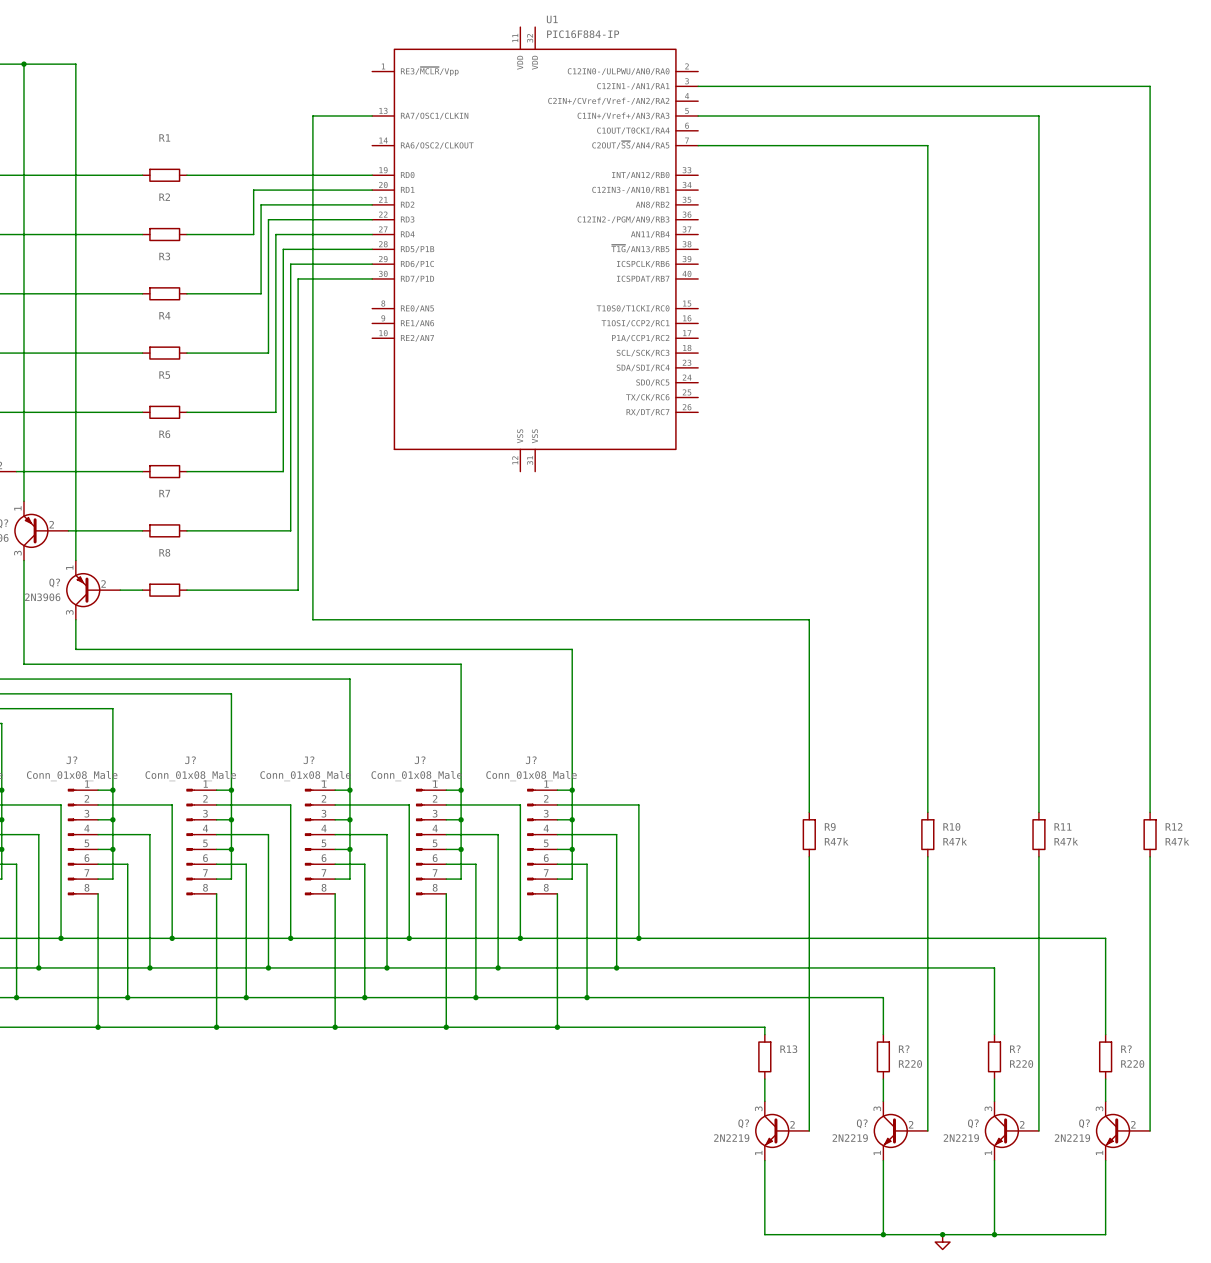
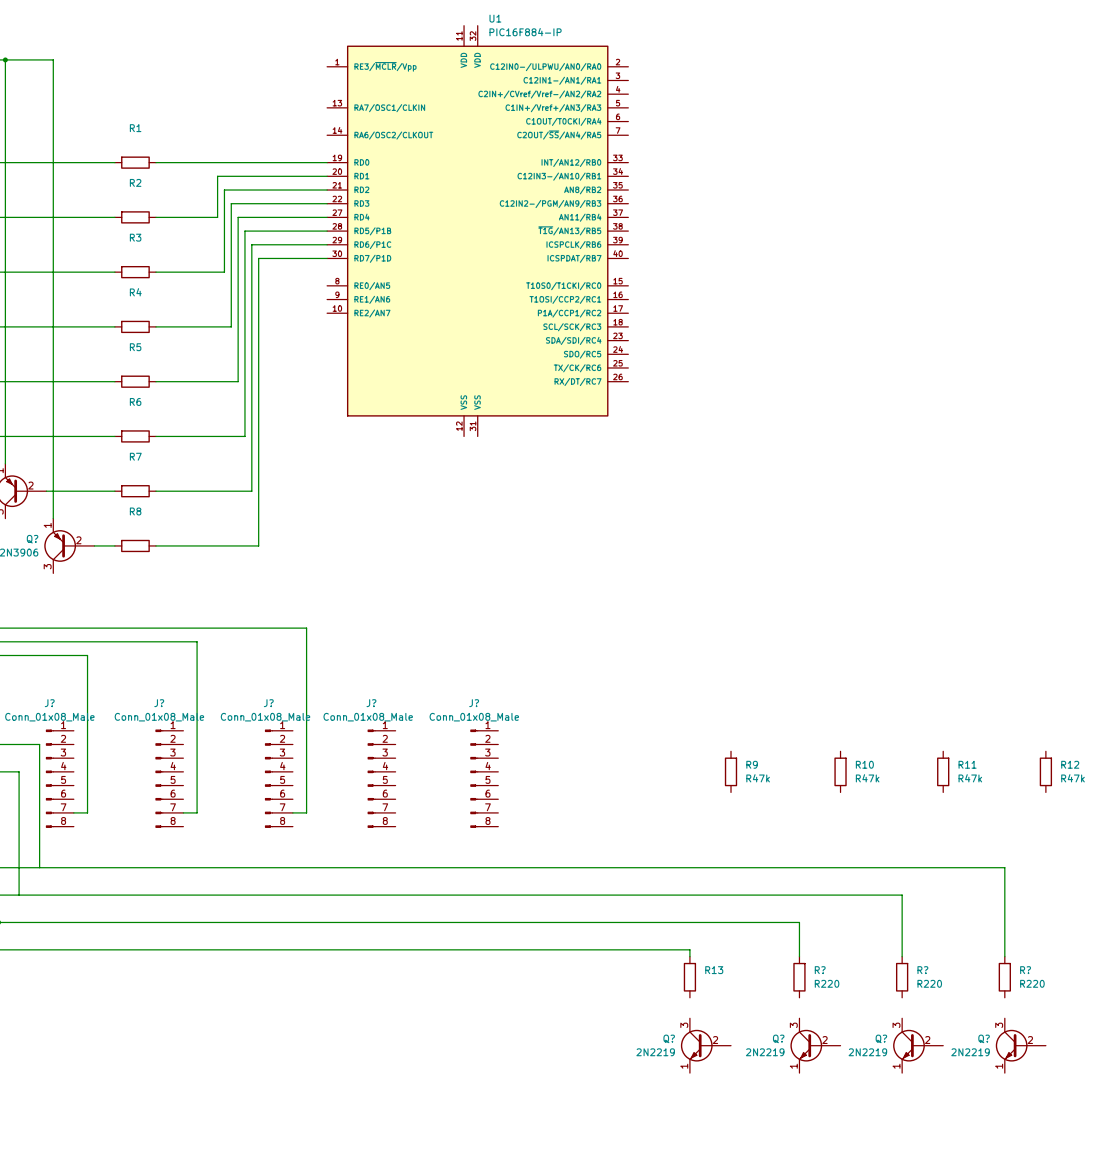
wire: (698, 86) (1150, 86) (1150, 812) -> none
wire: (372, 116) (312, 116) (312, 619) (809, 619) (809, 812) -> none
wire: (698, 116) (1038, 116) (1038, 812) -> none
wire: (698, 145) (927, 145) (927, 812) -> none
wire: (23, 560) (23, 664) (461, 664) (461, 879) (446, 879) -> none
wire: (75, 619) (75, 649) (572, 649) (572, 879) (557, 879) -> none
wire: (98, 790) (112, 790) -> none
junction: (112, 790) -> none
wire: (216, 790) (231, 790) -> none
junction: (231, 790) -> none
wire: (335, 790) (349, 790) -> none
junction: (349, 790) -> none
wire: (446, 790) (461, 790) -> none
junction: (461, 790) -> none
wire: (557, 790) (572, 790) -> none
junction: (572, 790) -> none
wire: (98, 804) (172, 804) (172, 938) -> none
wire: (216, 804) (290, 804) (290, 938) -> none
wire: (335, 804) (409, 804) (409, 938) -> none
wire: (446, 804) (520, 804) (520, 938) -> none
wire: (557, 804) (638, 804) (638, 938) -> none
wire: (98, 819) (112, 819) -> none
junction: (112, 819) -> none
wire: (216, 819) (231, 819) -> none
junction: (231, 819) -> none
wire: (335, 819) (349, 819) -> none
junction: (349, 819) -> none
wire: (446, 819) (461, 819) -> none
junction: (461, 819) -> none
wire: (557, 819) (572, 819) -> none
junction: (572, 819) -> none
wire: (98, 834) (149, 834) (149, 967) -> none
wire: (216, 834) (268, 834) (268, 967) -> none
wire: (335, 834) (387, 834) (387, 967) -> none
wire: (446, 834) (498, 834) (498, 967) -> none
wire: (557, 834) (616, 834) (616, 967) -> none
wire: (98, 849) (112, 849) -> none
junction: (112, 849) -> none
wire: (216, 849) (231, 849) -> none
junction: (231, 849) -> none
wire: (335, 849) (349, 849) -> none
junction: (349, 849) -> none
wire: (446, 849) (461, 849) -> none
junction: (461, 849) -> none
wire: (557, 849) (572, 849) -> none
junction: (572, 849) -> none
wire: (809, 856) (809, 1130) -> none
wire: (927, 856) (927, 1130) -> none
wire: (1038, 856) (1038, 1130) -> none
wire: (1150, 856) (1150, 1130) -> none
wire: (98, 864) (127, 864) (127, 997) -> none
wire: (216, 864) (246, 864) (246, 997) -> none
wire: (335, 864) (364, 864) (364, 997) -> none
wire: (446, 864) (475, 864) (475, 997) -> none
wire: (557, 864) (587, 864) (587, 997) -> none
wire: (98, 893) (98, 1027) -> none
wire: (216, 893) (216, 1027) -> none
wire: (335, 893) (335, 1027) -> none
wire: (446, 893) (446, 1027) -> none
wire: (557, 893) (557, 1027) -> none
junction: (61, 938) -> none
junction: (172, 938) -> none
junction: (290, 938) -> none
junction: (409, 938) -> none
junction: (520, 938) -> none
junction: (638, 938) -> none
junction: (38, 967) -> none
junction: (149, 967) -> none
junction: (268, 967) -> none
junction: (387, 967) -> none
junction: (498, 967) -> none
junction: (616, 967) -> none
junction: (127, 997) -> none
junction: (246, 997) -> none
junction: (364, 997) -> none
junction: (475, 997) -> none
junction: (587, 997) -> none
junction: (98, 1027) -> none
junction: (216, 1027) -> none
junction: (335, 1027) -> none
junction: (446, 1027) -> none
junction: (557, 1027) -> none
wire: (764, 1079) (764, 1101) -> none
wire: (883, 1079) (883, 1101) -> none
wire: (994, 1079) (994, 1101) -> none
wire: (1105, 1079) (1105, 1101) -> none
wire: (764, 1160) (764, 1234) (1105, 1234) (1105, 1160) -> none
wire: (883, 1160) (883, 1234) -> none
wire: (994, 1160) (994, 1234) -> none
junction: (883, 1234) -> none
junction: (942, 1234) -> none
junction: (994, 1234) -> none
power symbol: (942, 1242) -> none

